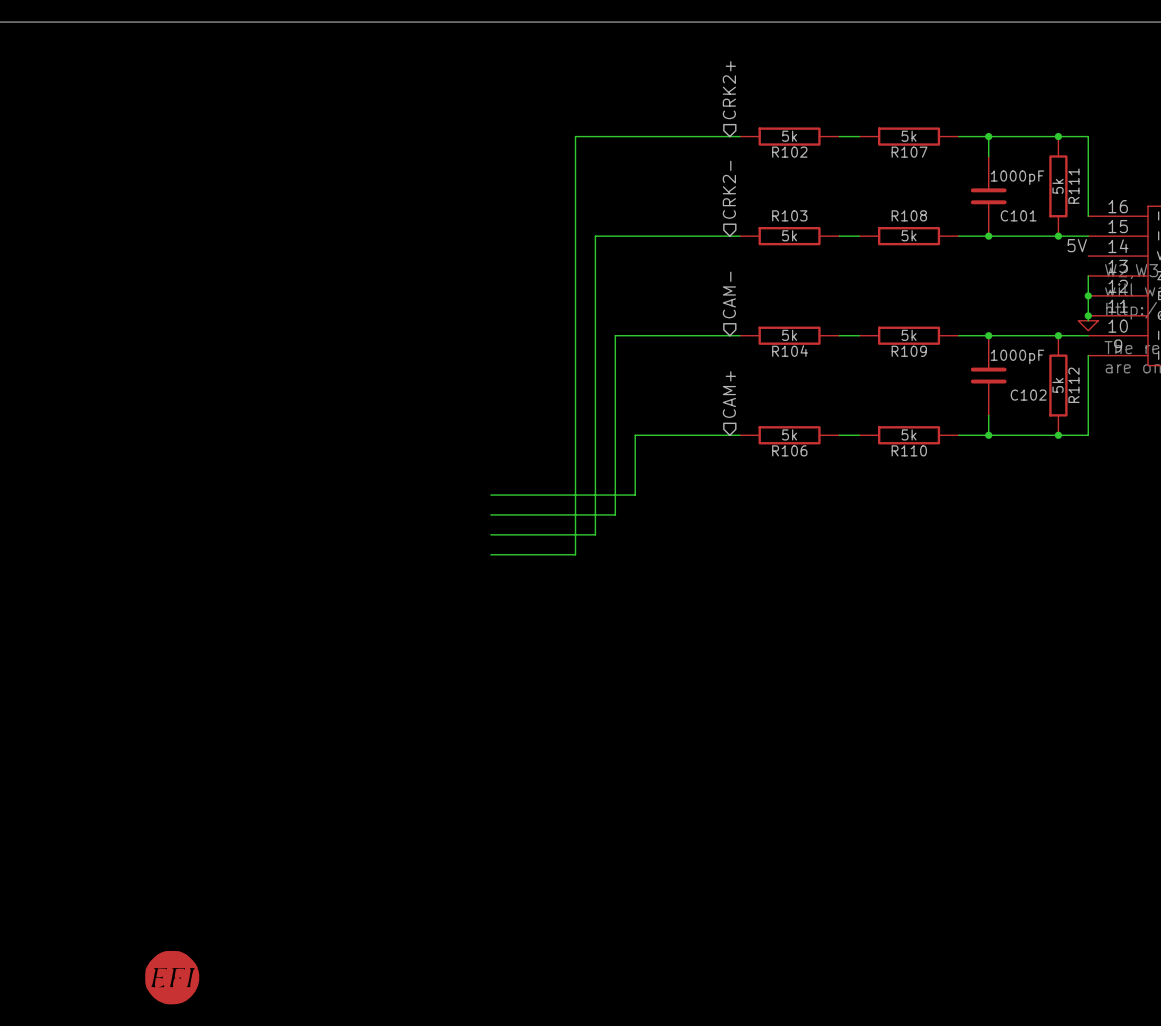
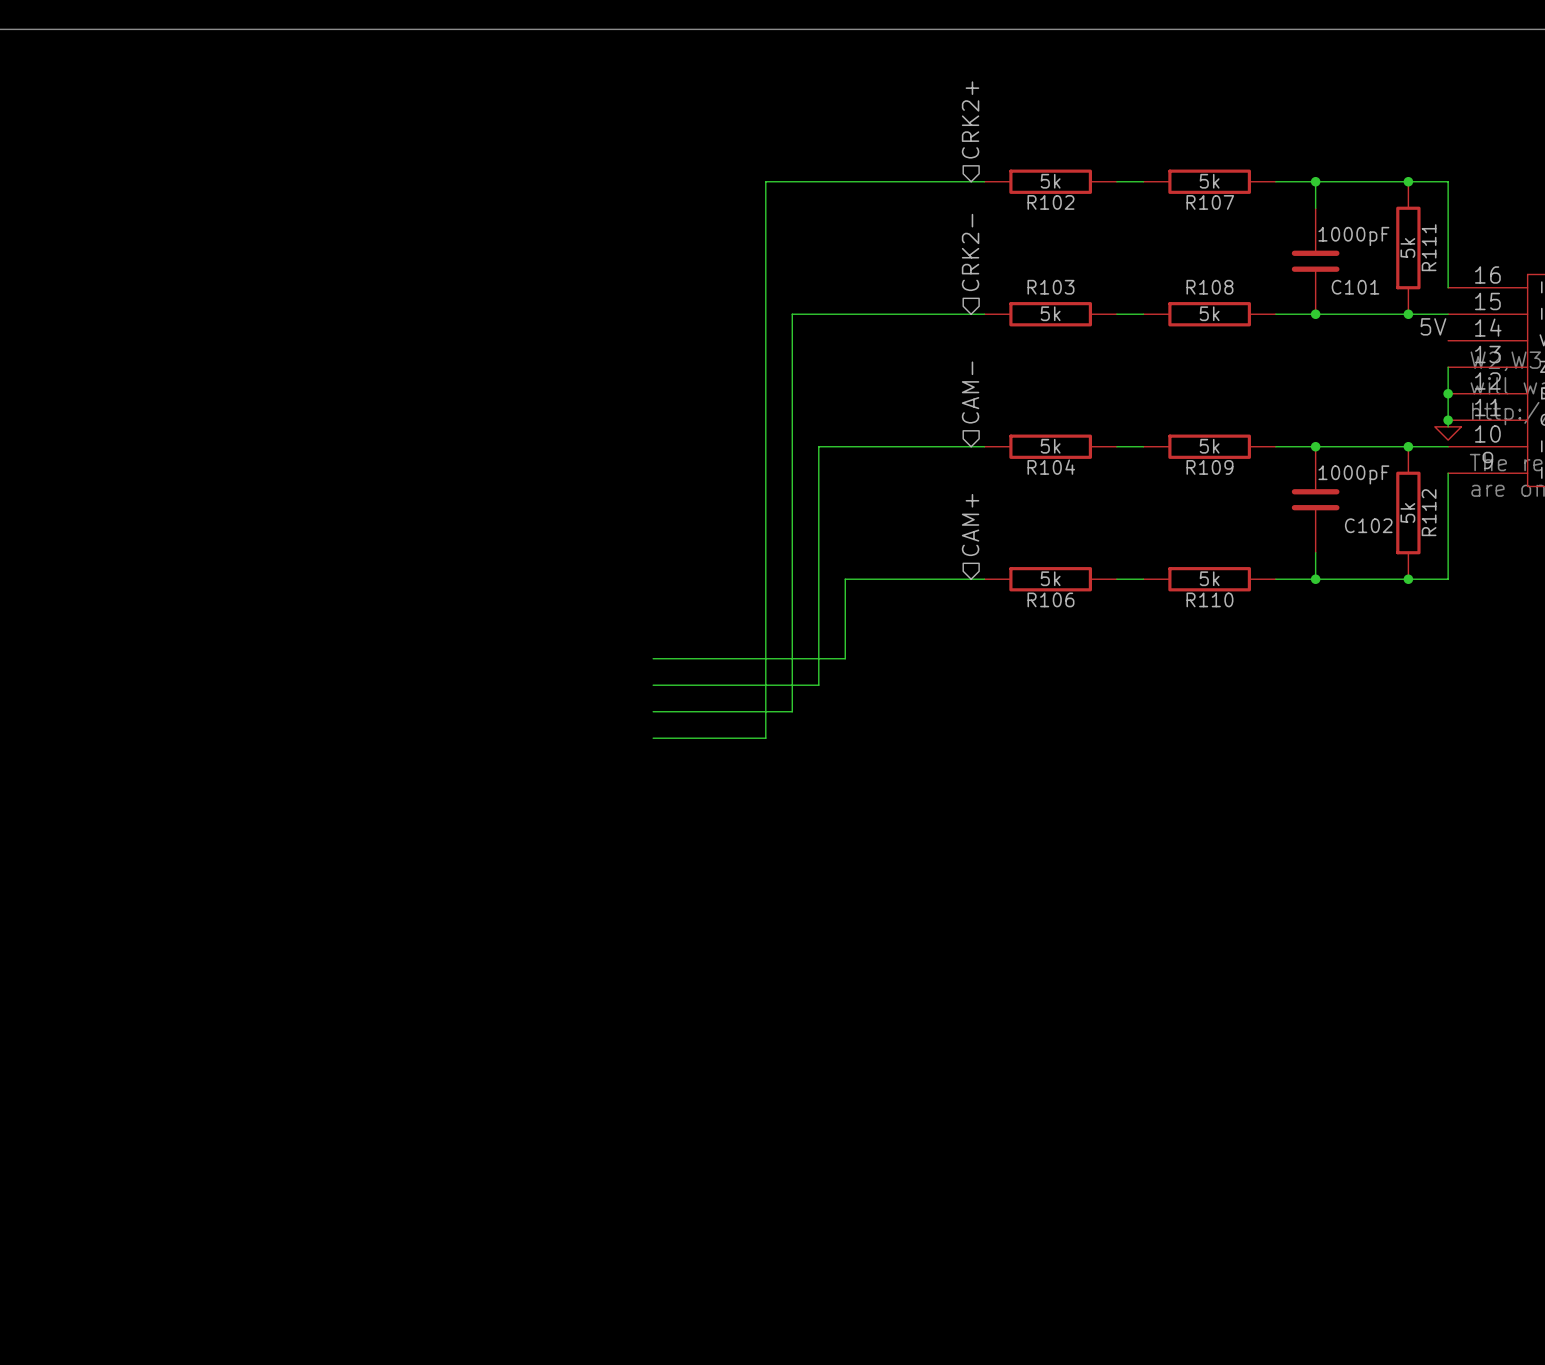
part: (172, 977) -> none

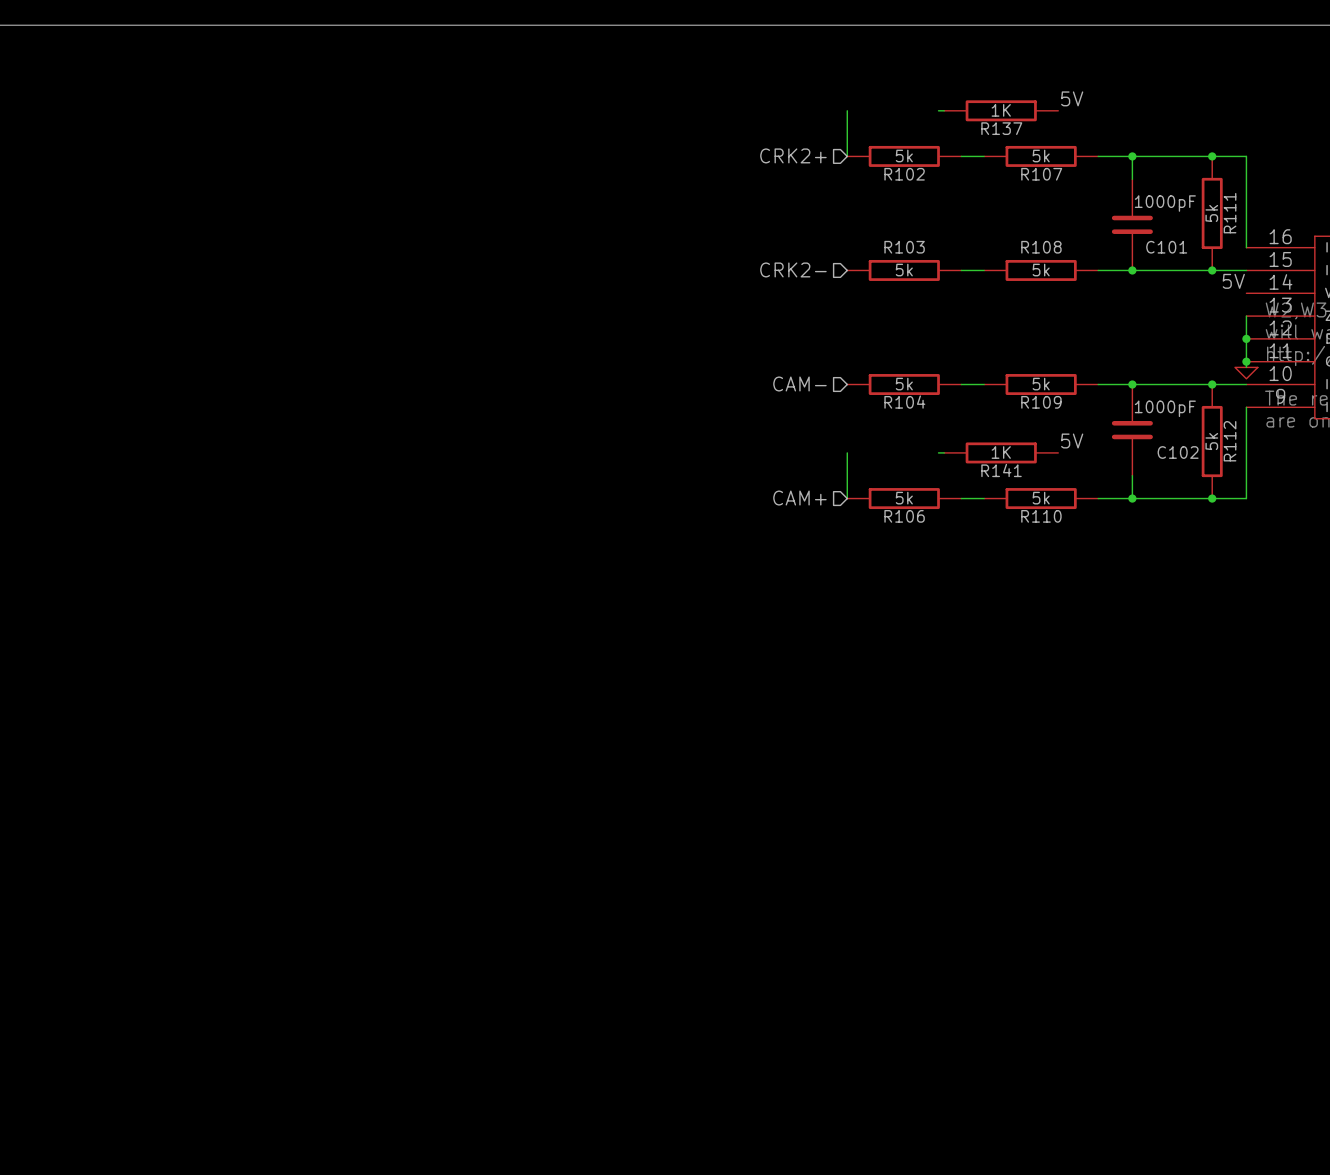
label: none -> 5V (1072, 98)
hierarchical label rotation: 0° (970, 119) -> 90° counterclockwise (793, 155)
wire: none -> (938, 110) (944, 110)
R137: none -> 1K (1001, 110)
wire: (984, 181) (765, 181) (765, 738) (653, 738) -> (847, 156) (847, 110)
hierarchical label rotation: 0° (970, 252) -> 90° counterclockwise (793, 269)
wire: (984, 314) (792, 314) (792, 711) (653, 711) -> none
hierarchical label rotation: 0° (970, 392) -> 90° counterclockwise (799, 383)
wire: (984, 446) (818, 446) (818, 685) (653, 685) -> none
label: none -> 5V (1072, 440)
hierarchical label rotation: 0° (970, 524) -> 90° counterclockwise (799, 498)
wire: none -> (938, 452) (944, 452)
R141: none -> 1K (1001, 452)
wire: (984, 579) (845, 579) (845, 658) (653, 658) -> (847, 498) (847, 452)

